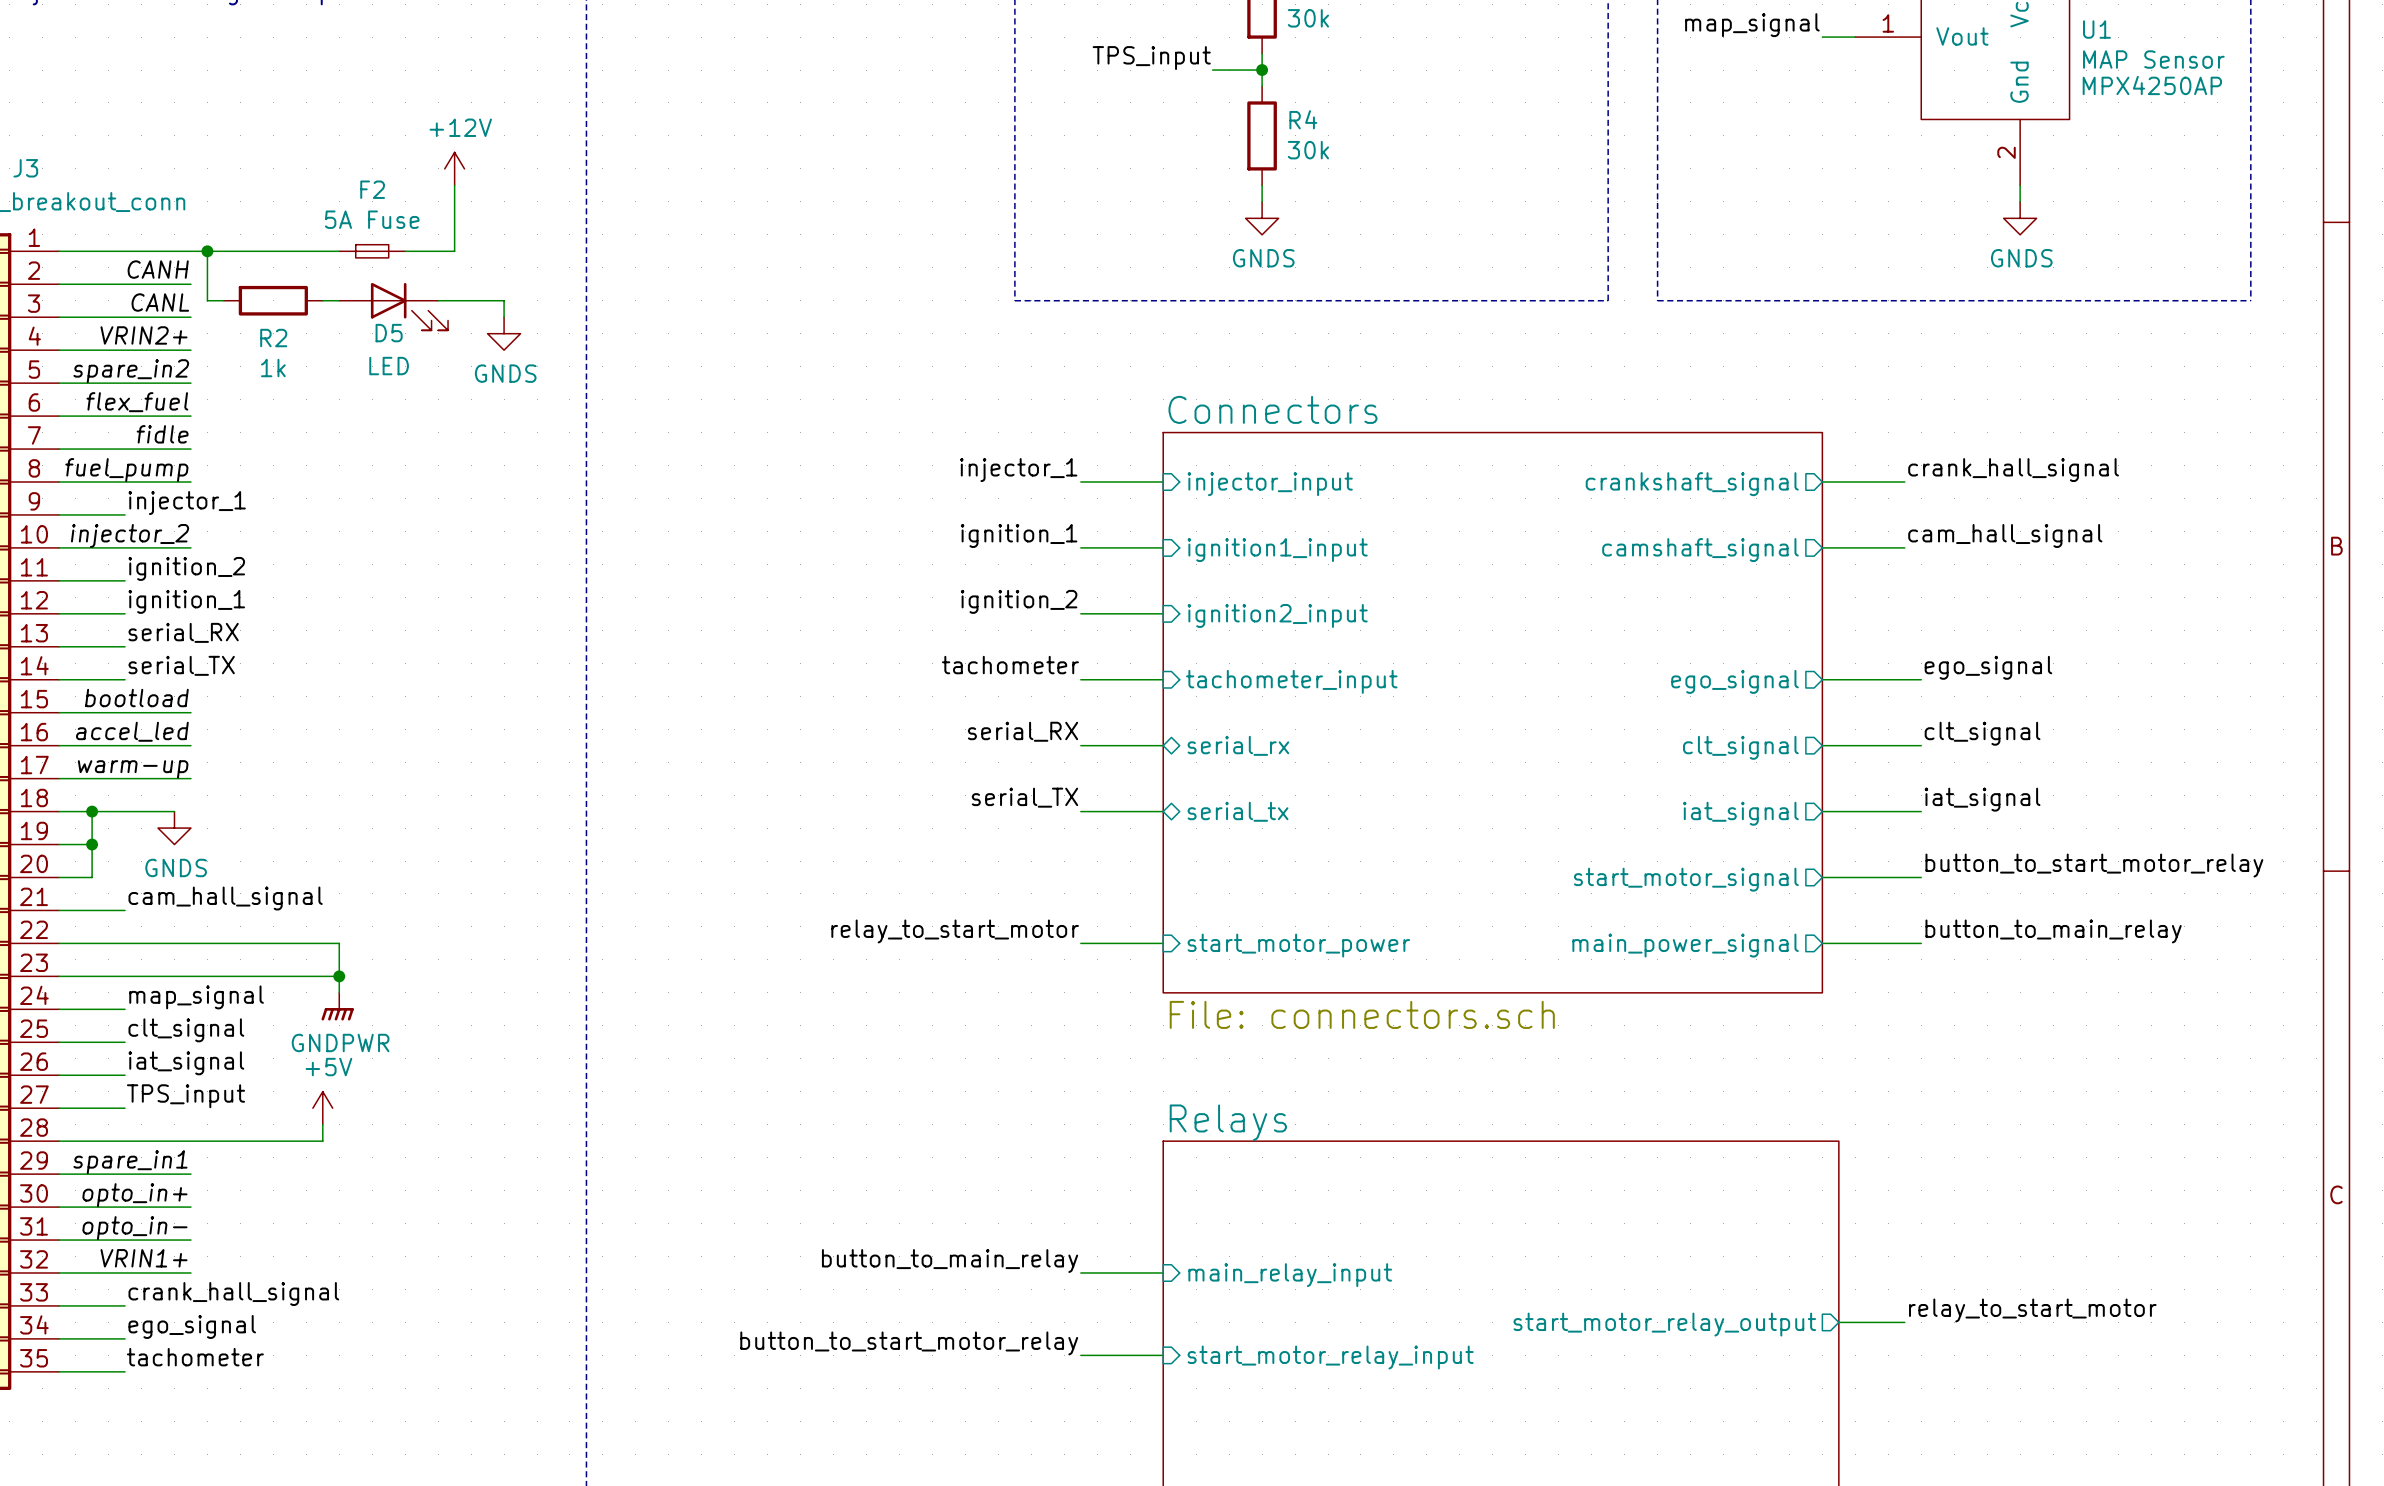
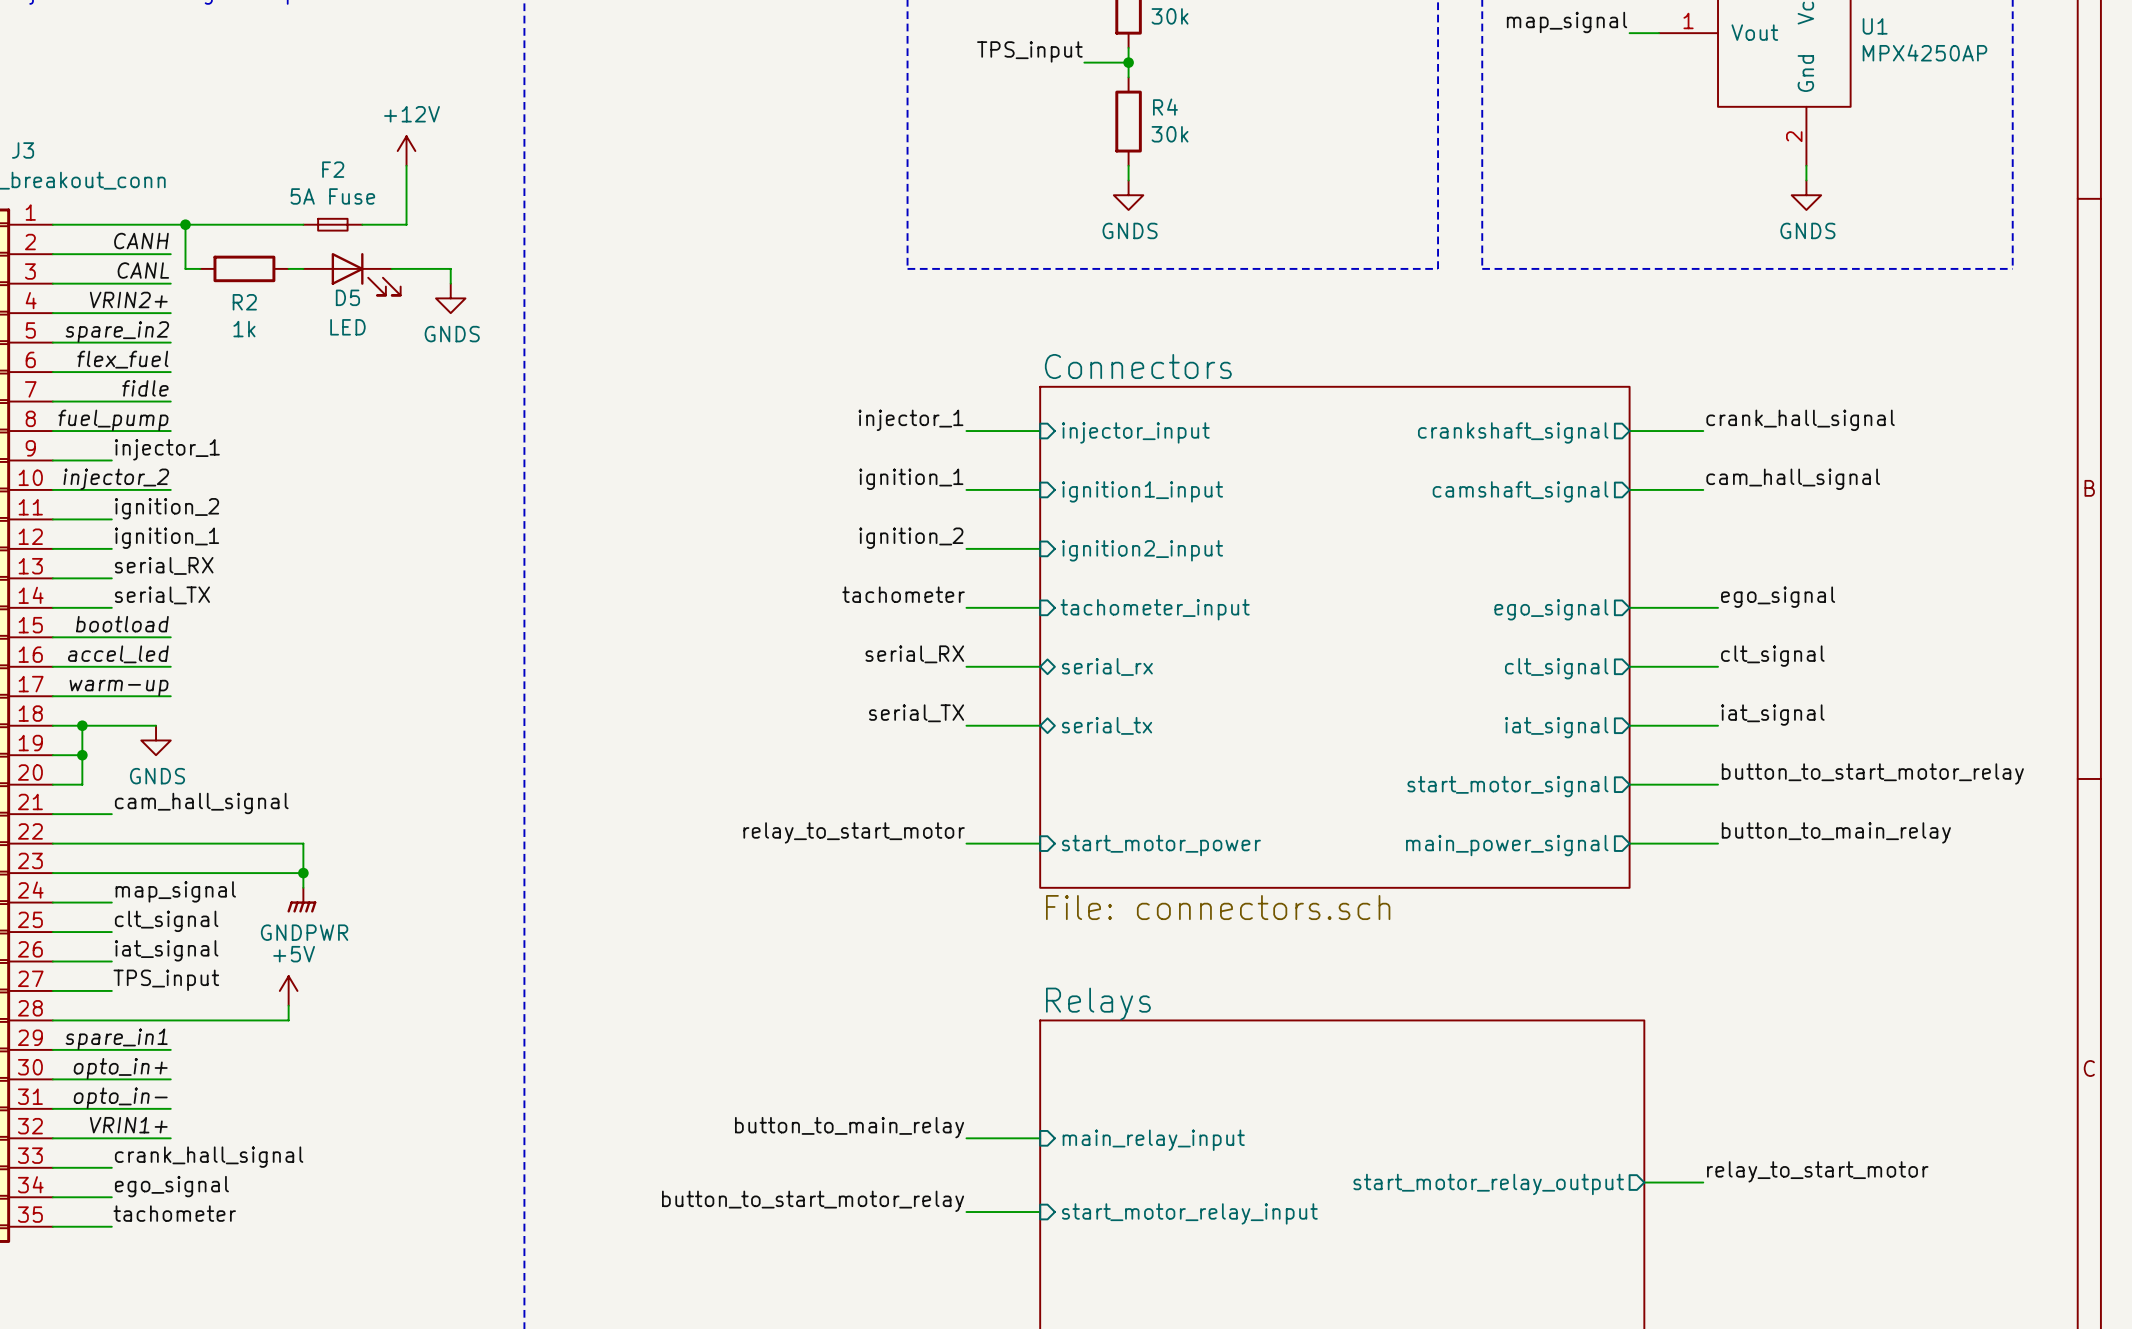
U1 value: MAP Sensor (2153, 59) -> MPX4250AP (1924, 52)
U1 text: MPX4250AP (2152, 85) -> none

